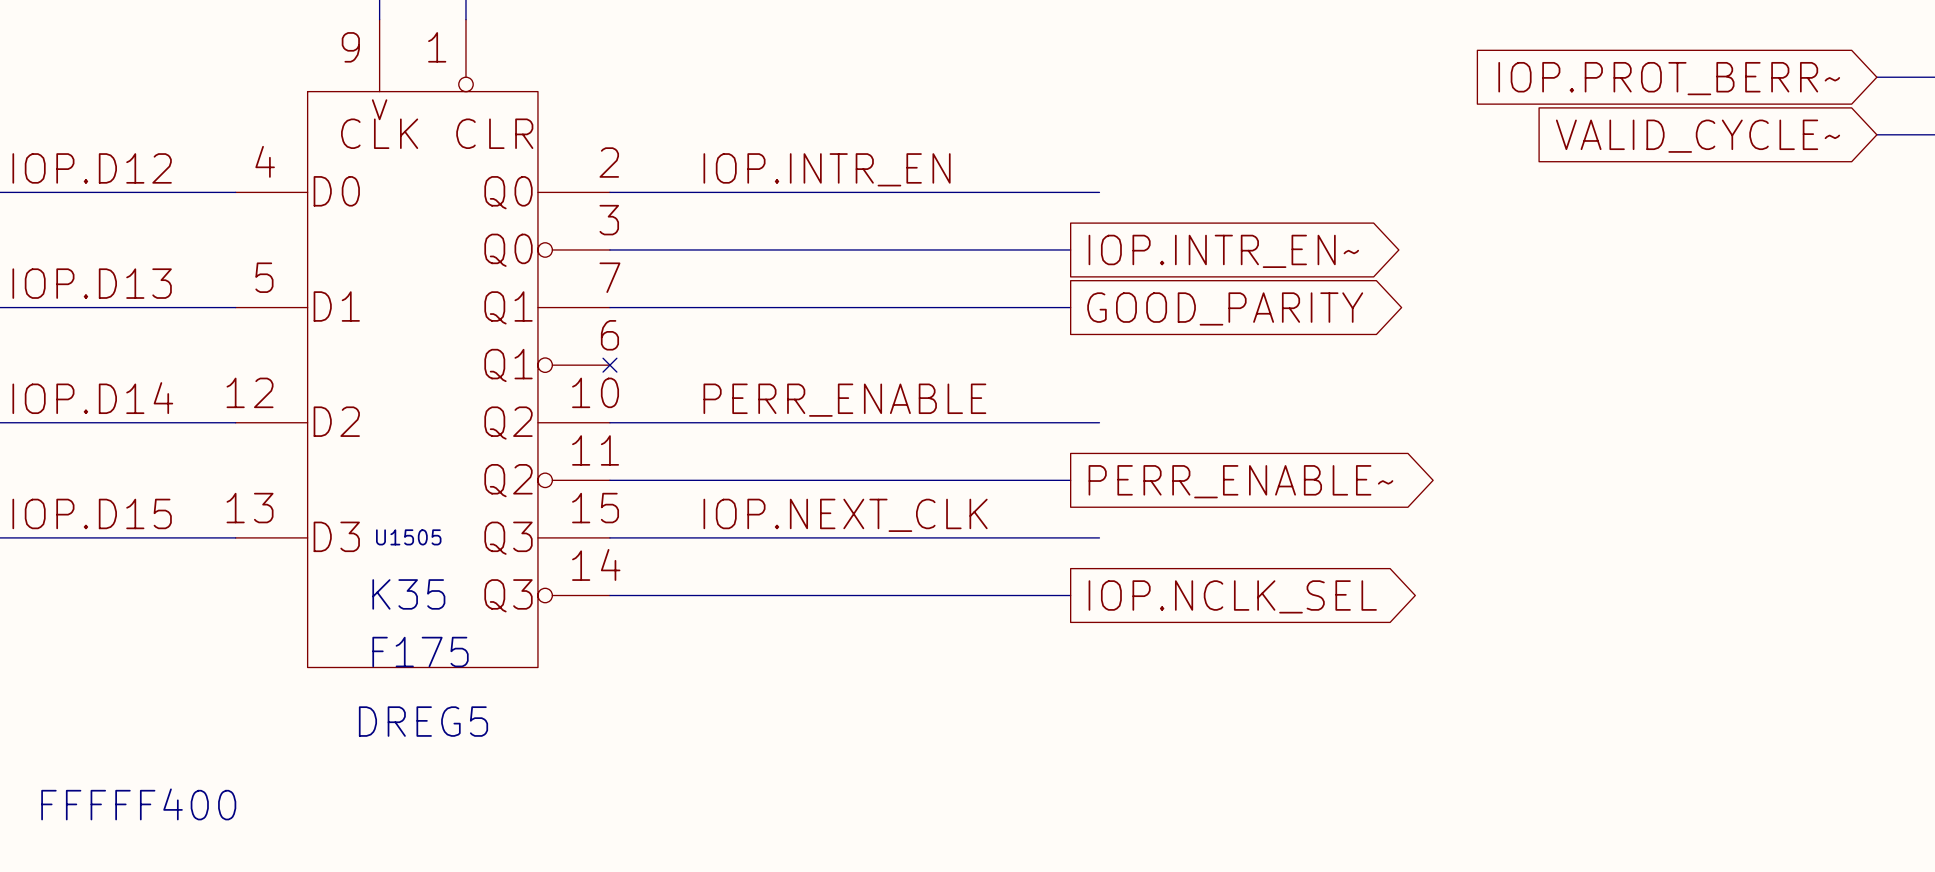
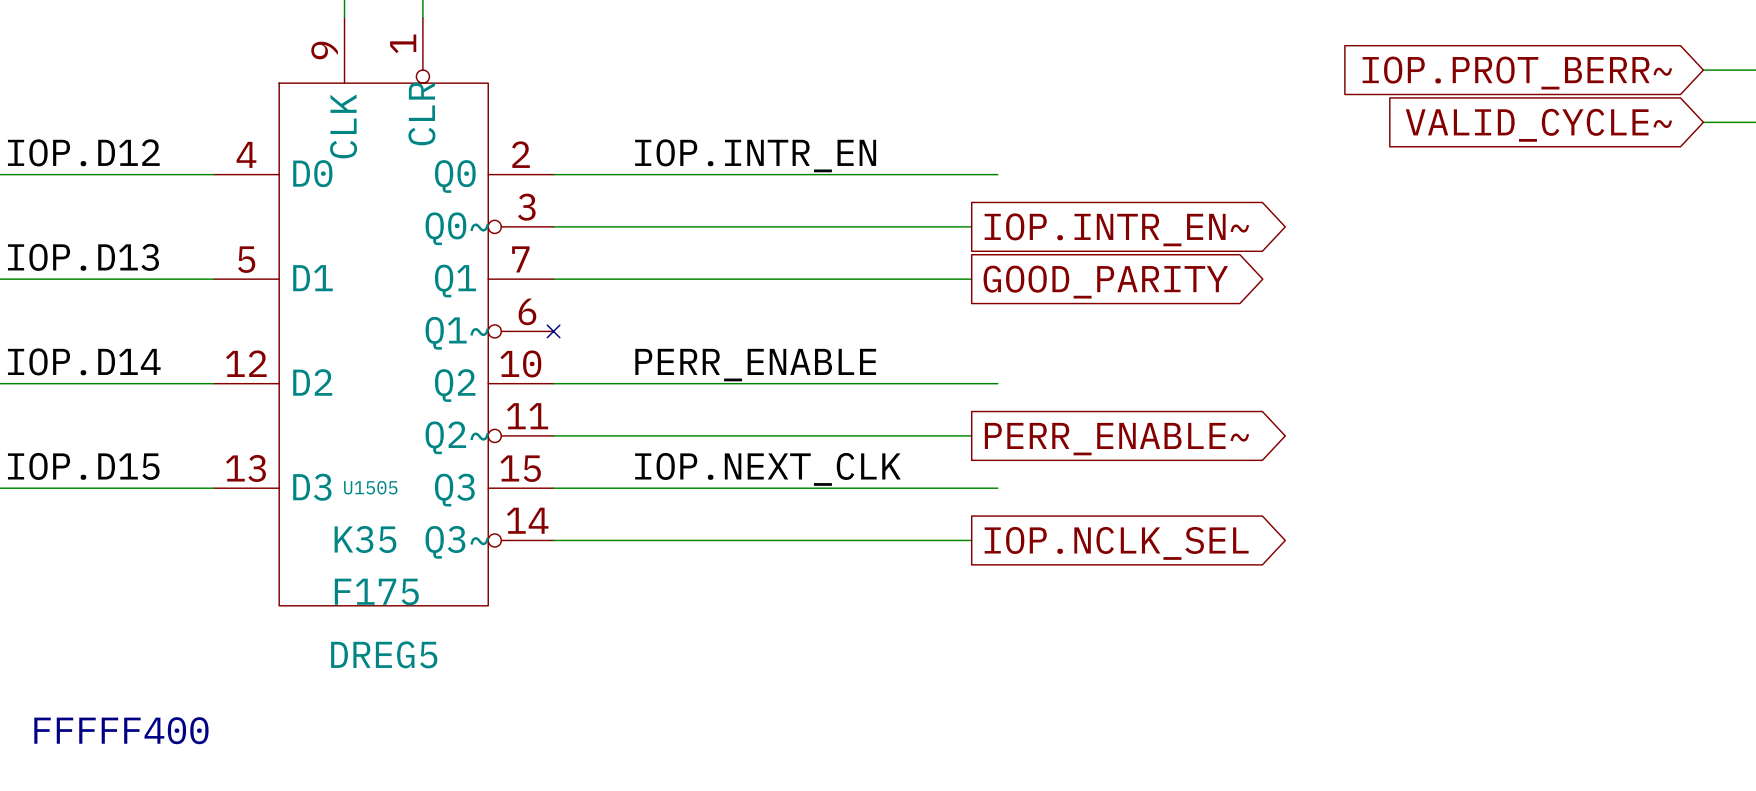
U1505 symbol: [235, 19, 610, 668] -> [213, 17, 554, 606]

